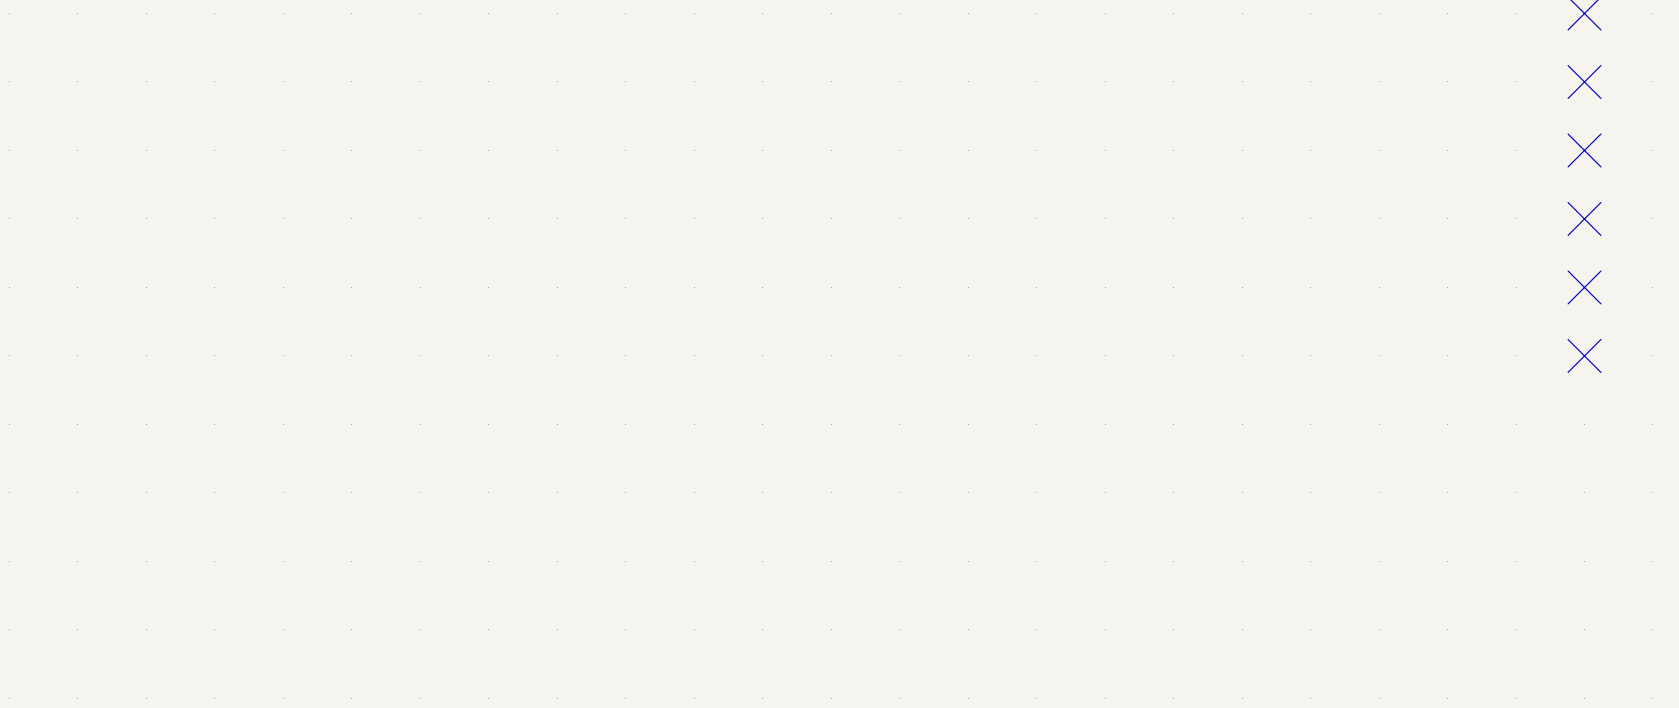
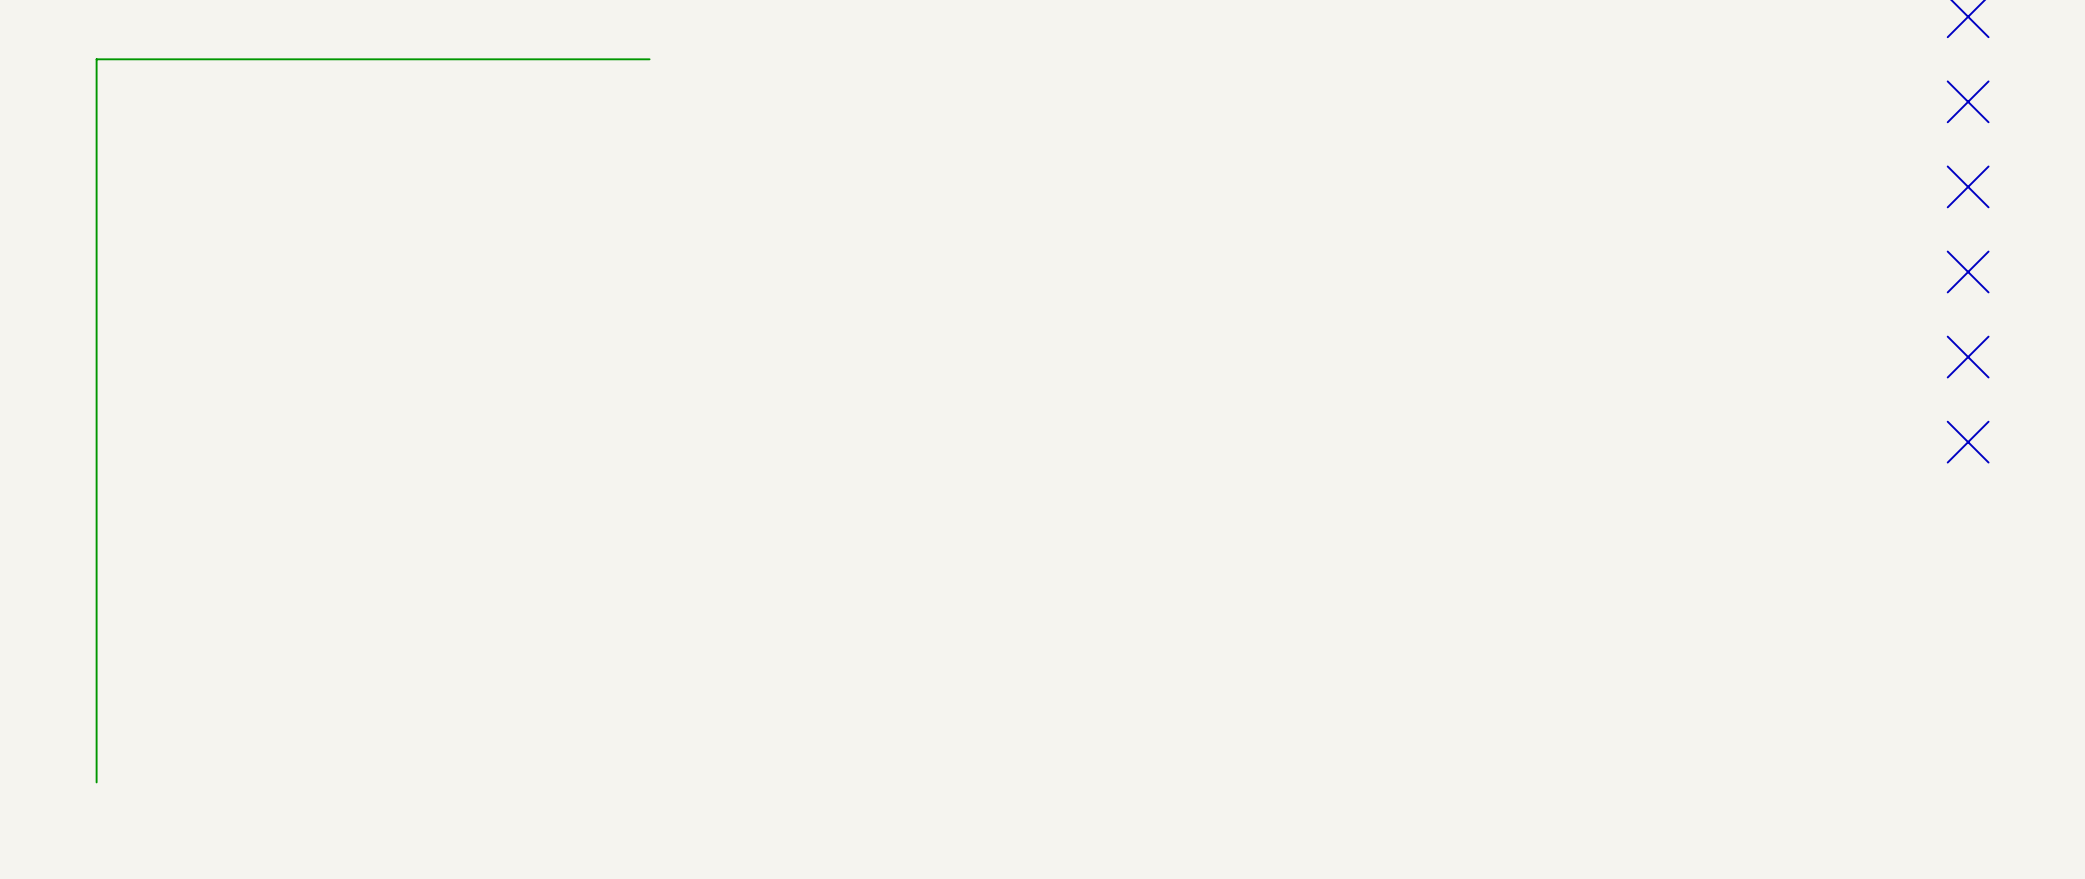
wire: none -> (649, 59) (96, 59) (96, 782)

